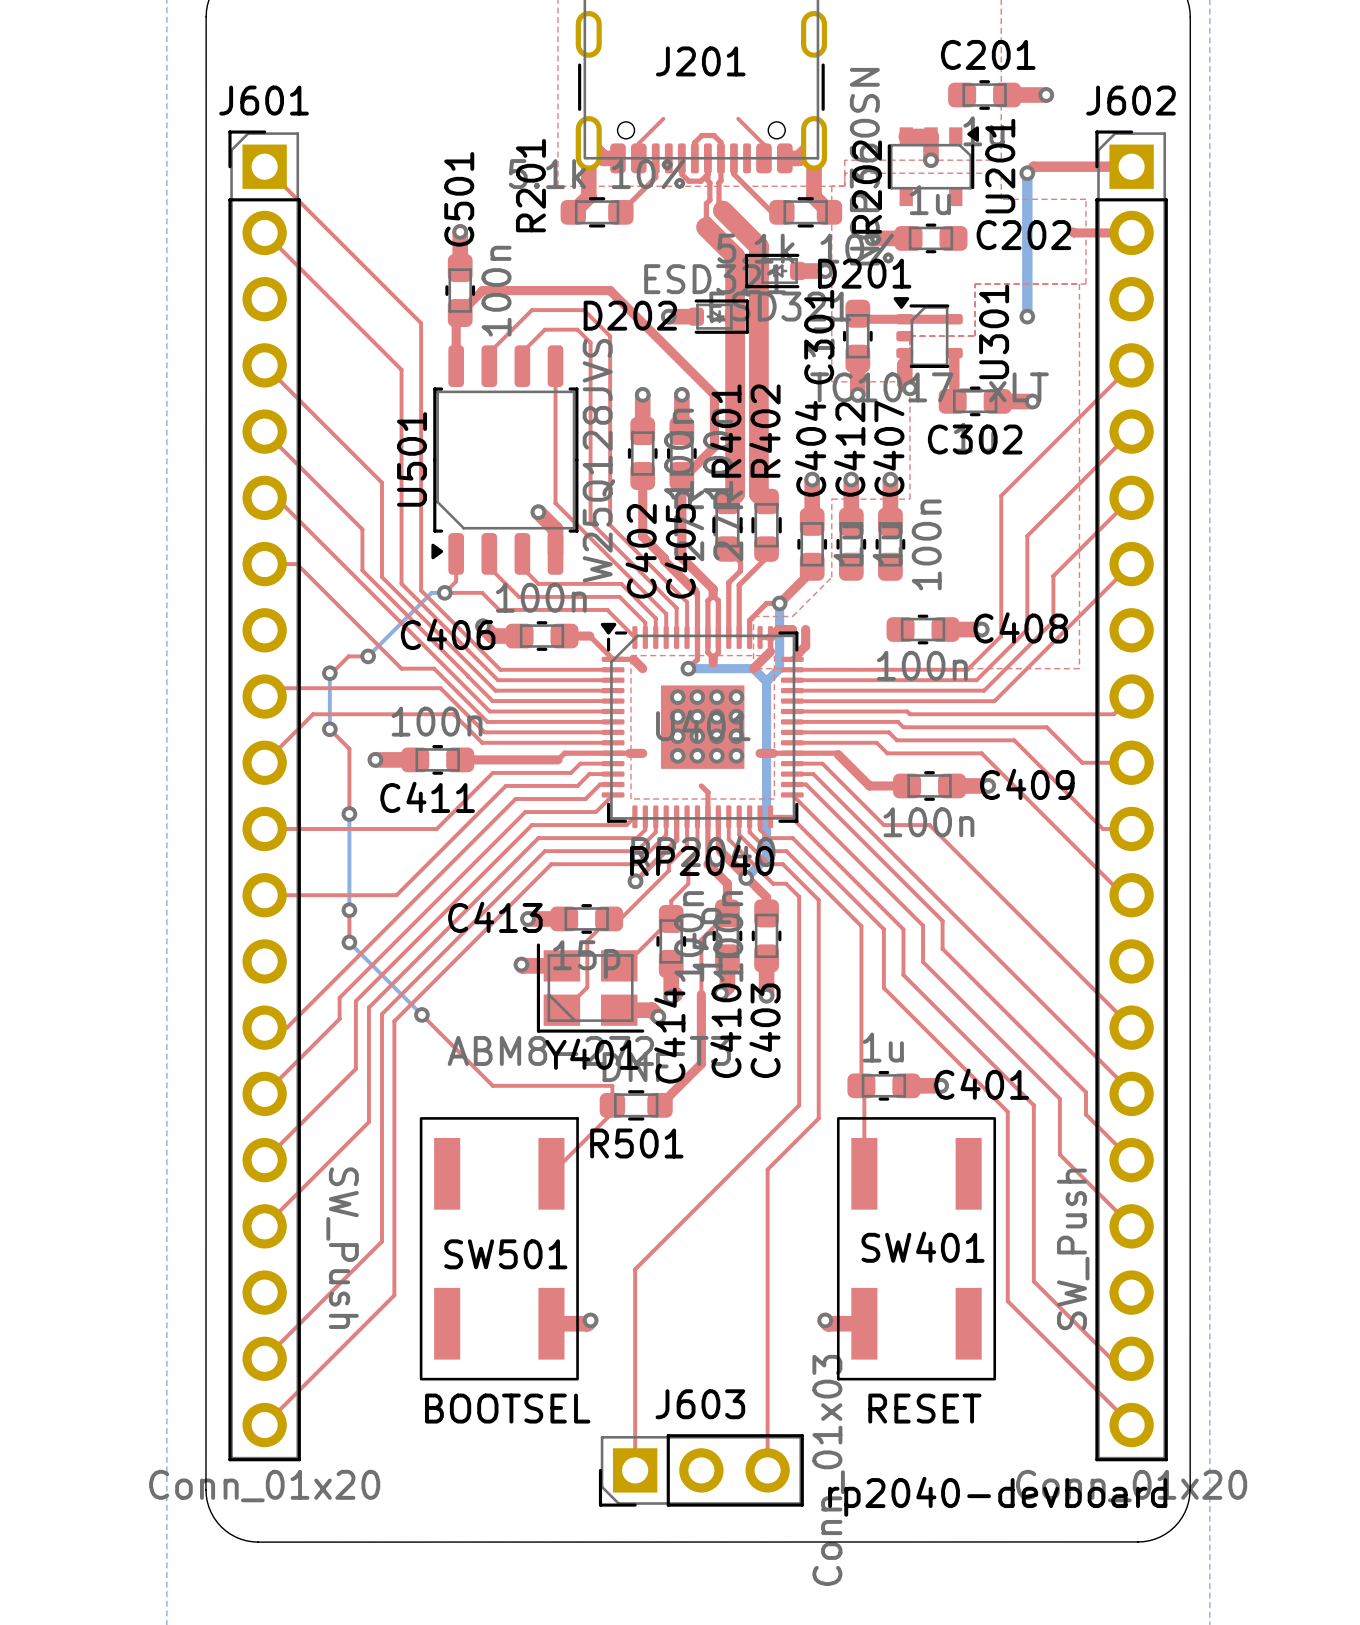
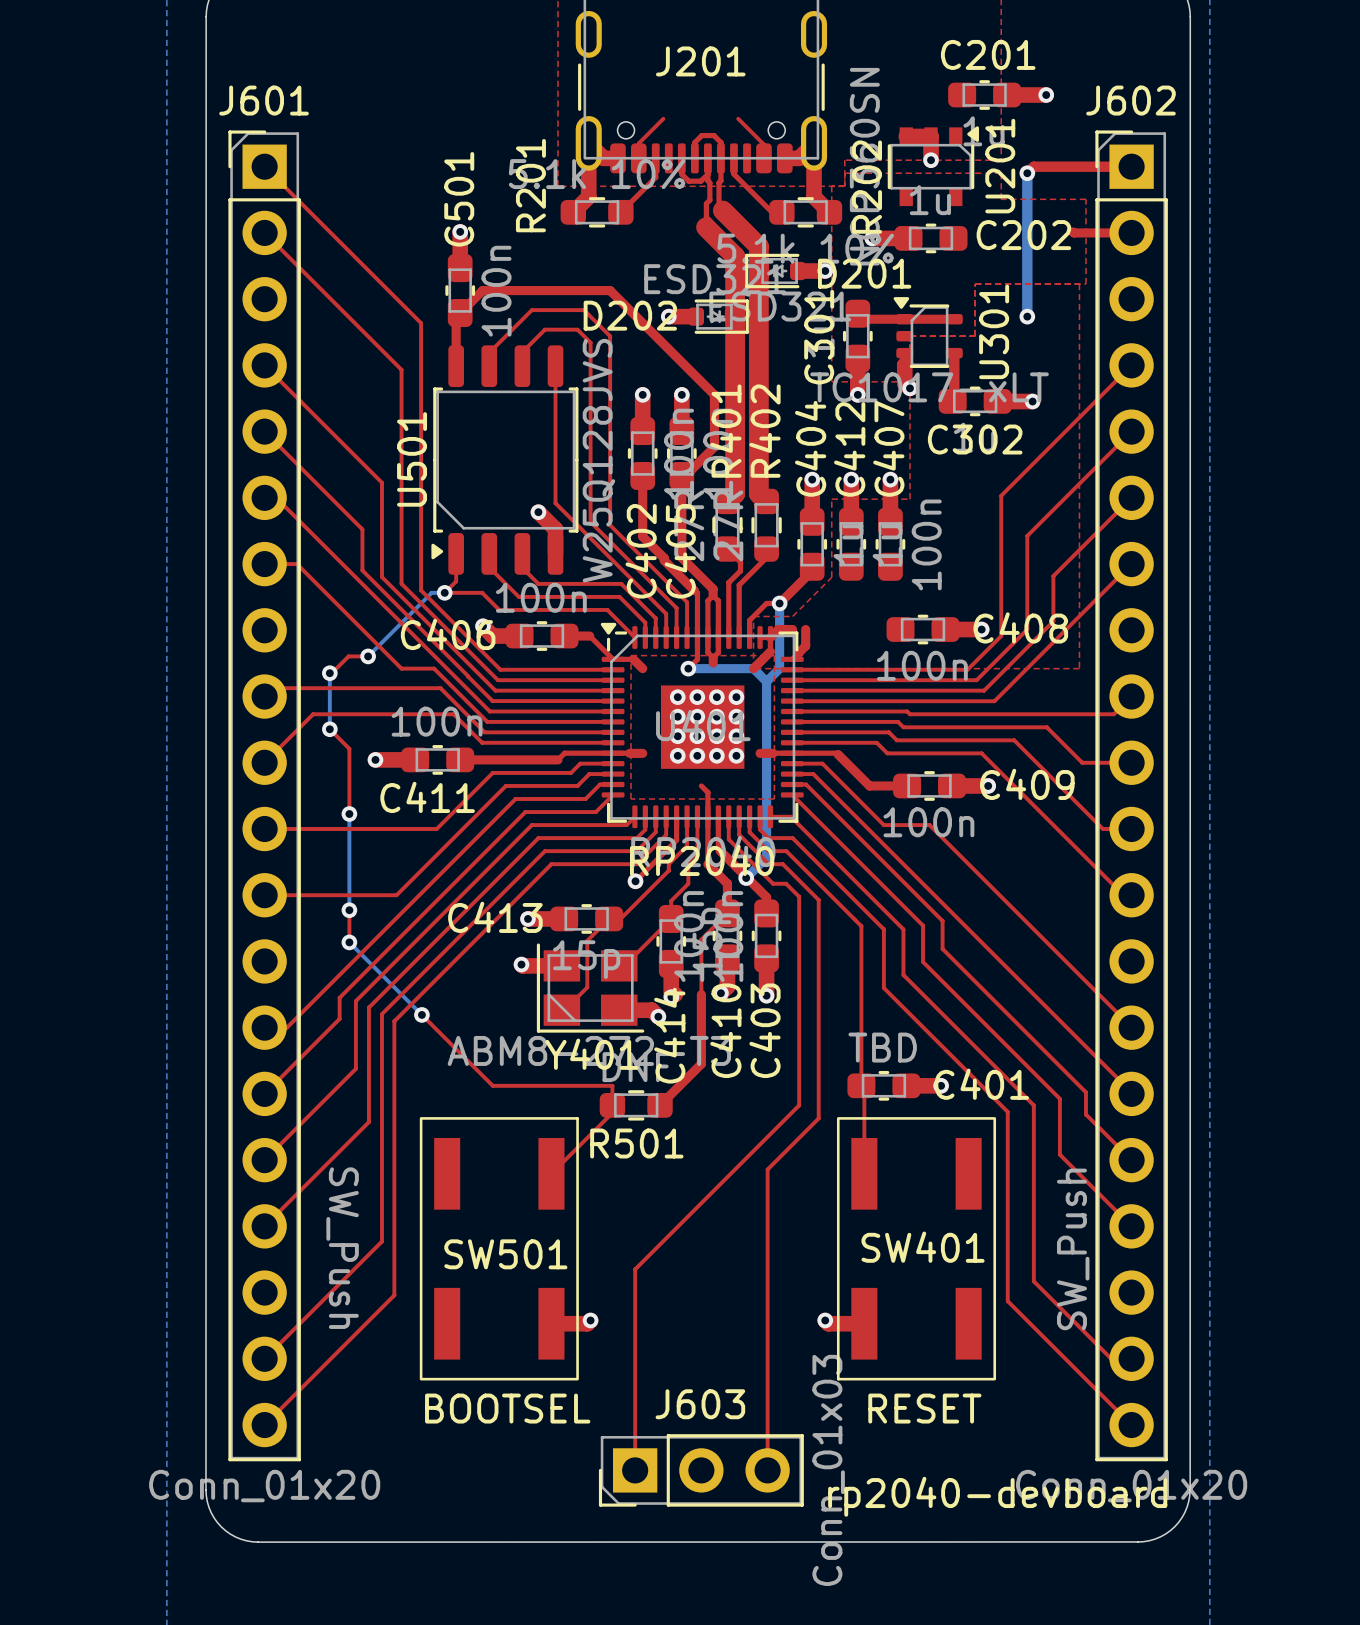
C401 value: 1u (883, 1047) -> TBD (882, 1047)

